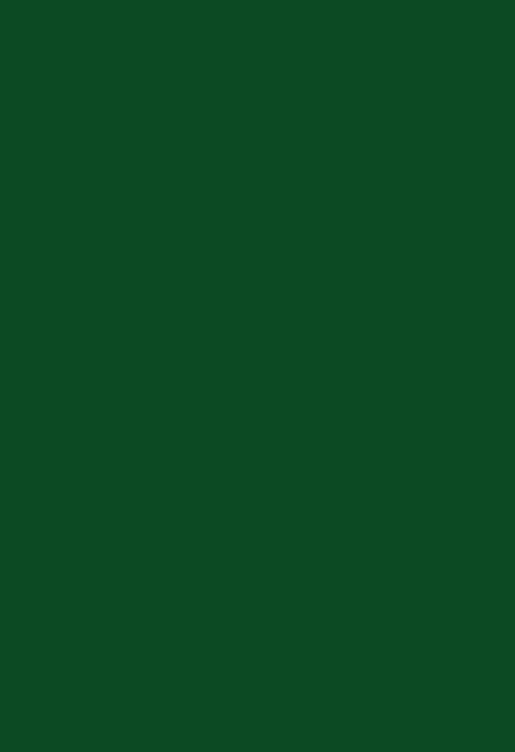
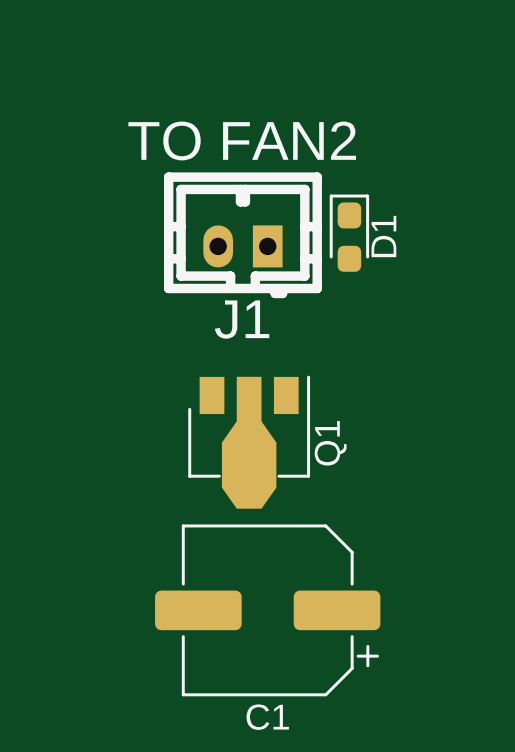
D1: none -> (349, 233)
J1: none -> TO FAN2 (242, 235)
Q1: none -> (249, 442)
C1: none -> (267, 610)

